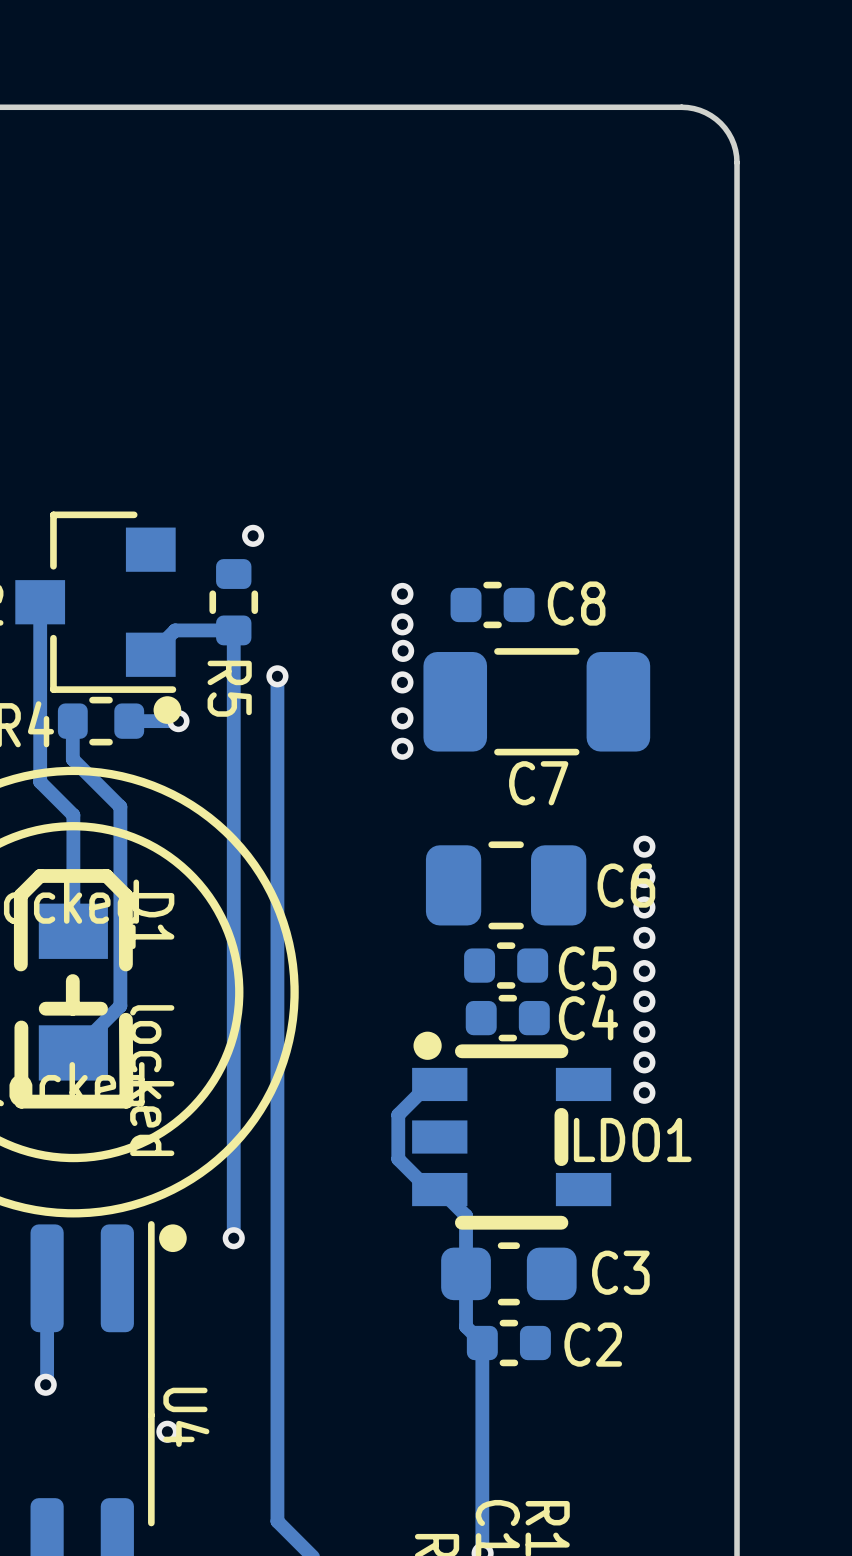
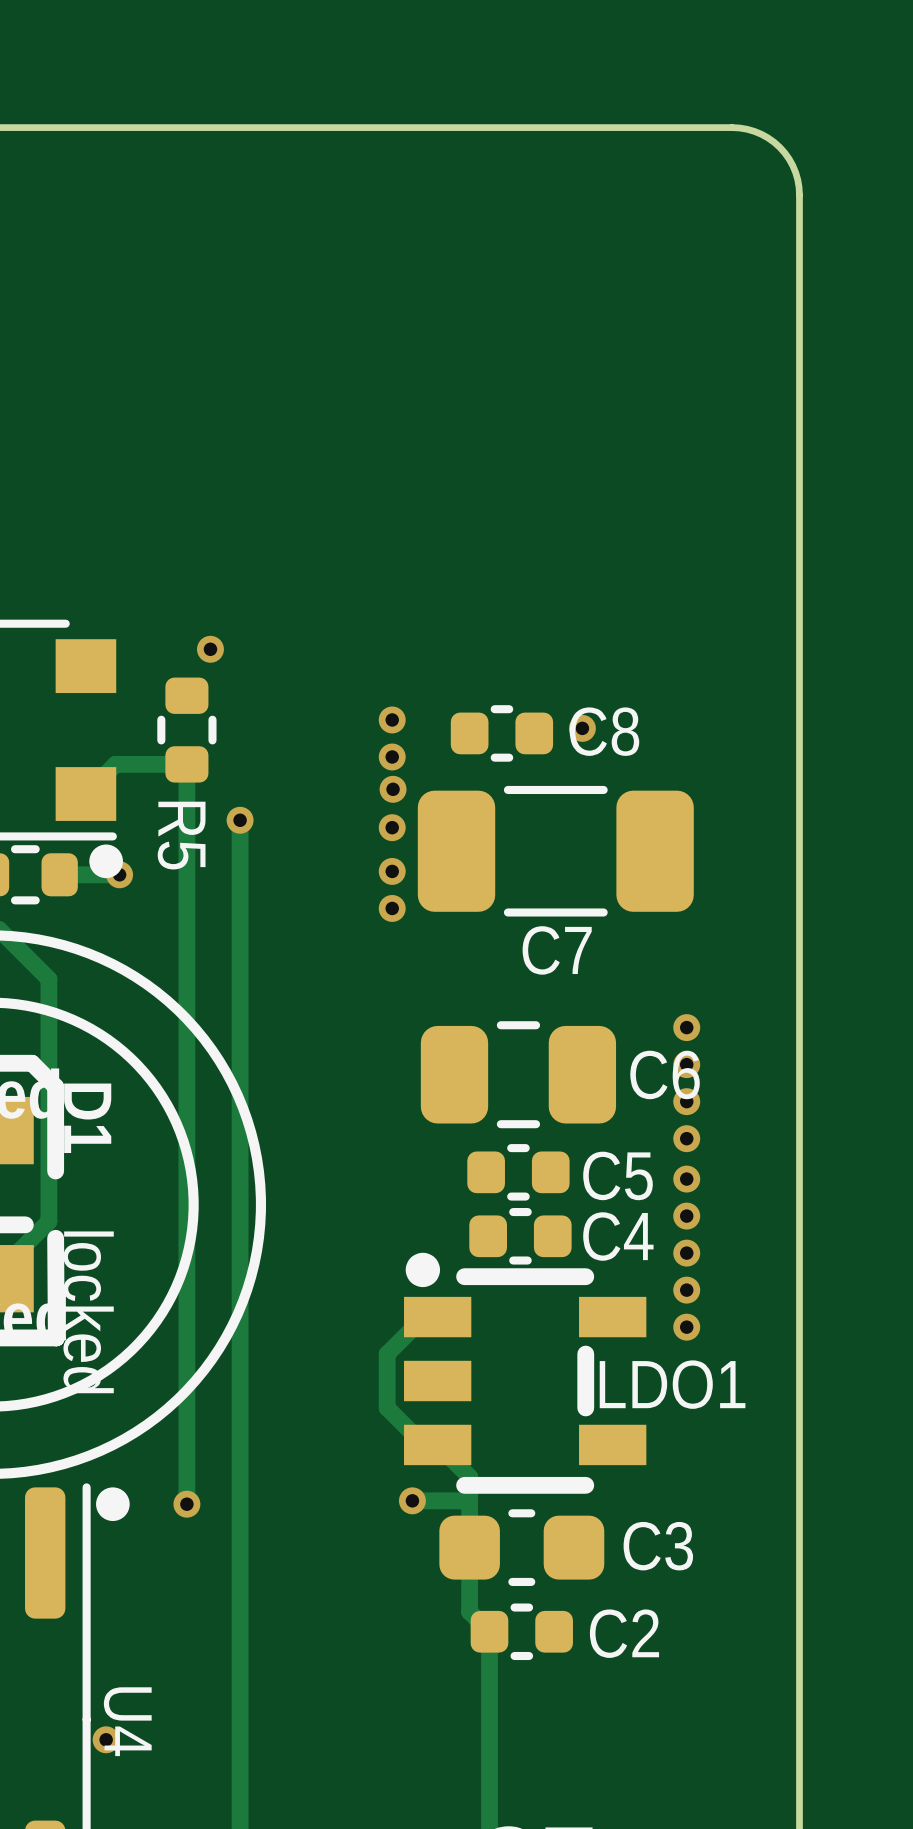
via: none -> (582, 728)
track: none -> (469, 1497) (466, 1500) (412, 1500)
via: none -> (412, 1500)

